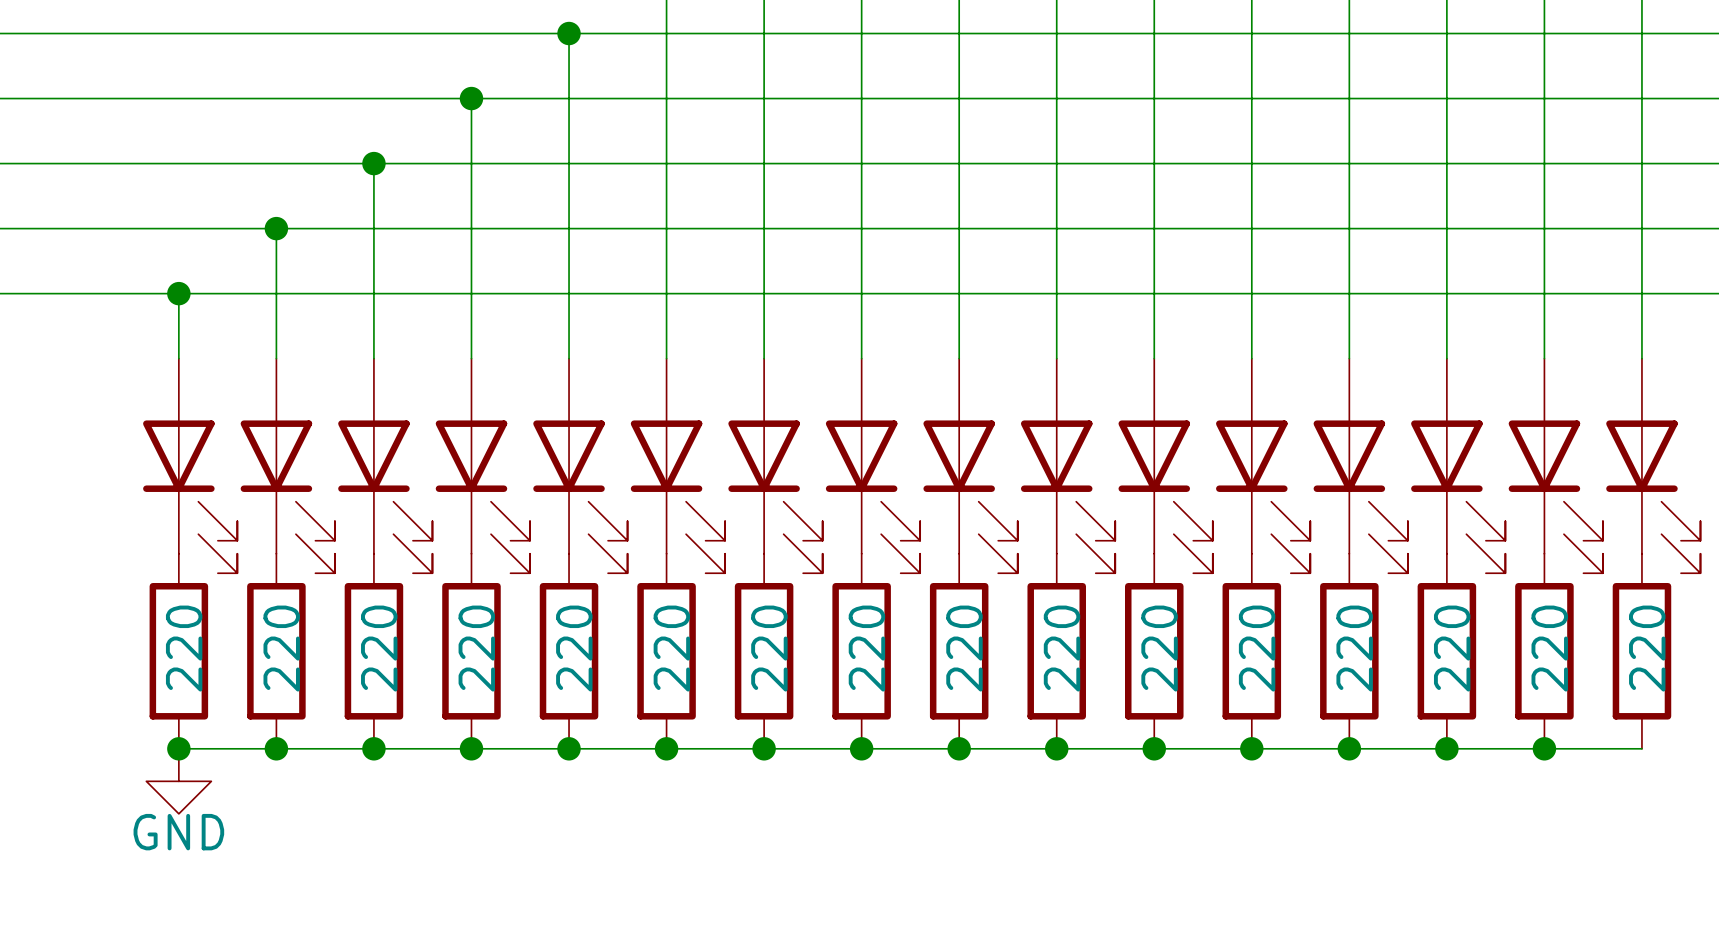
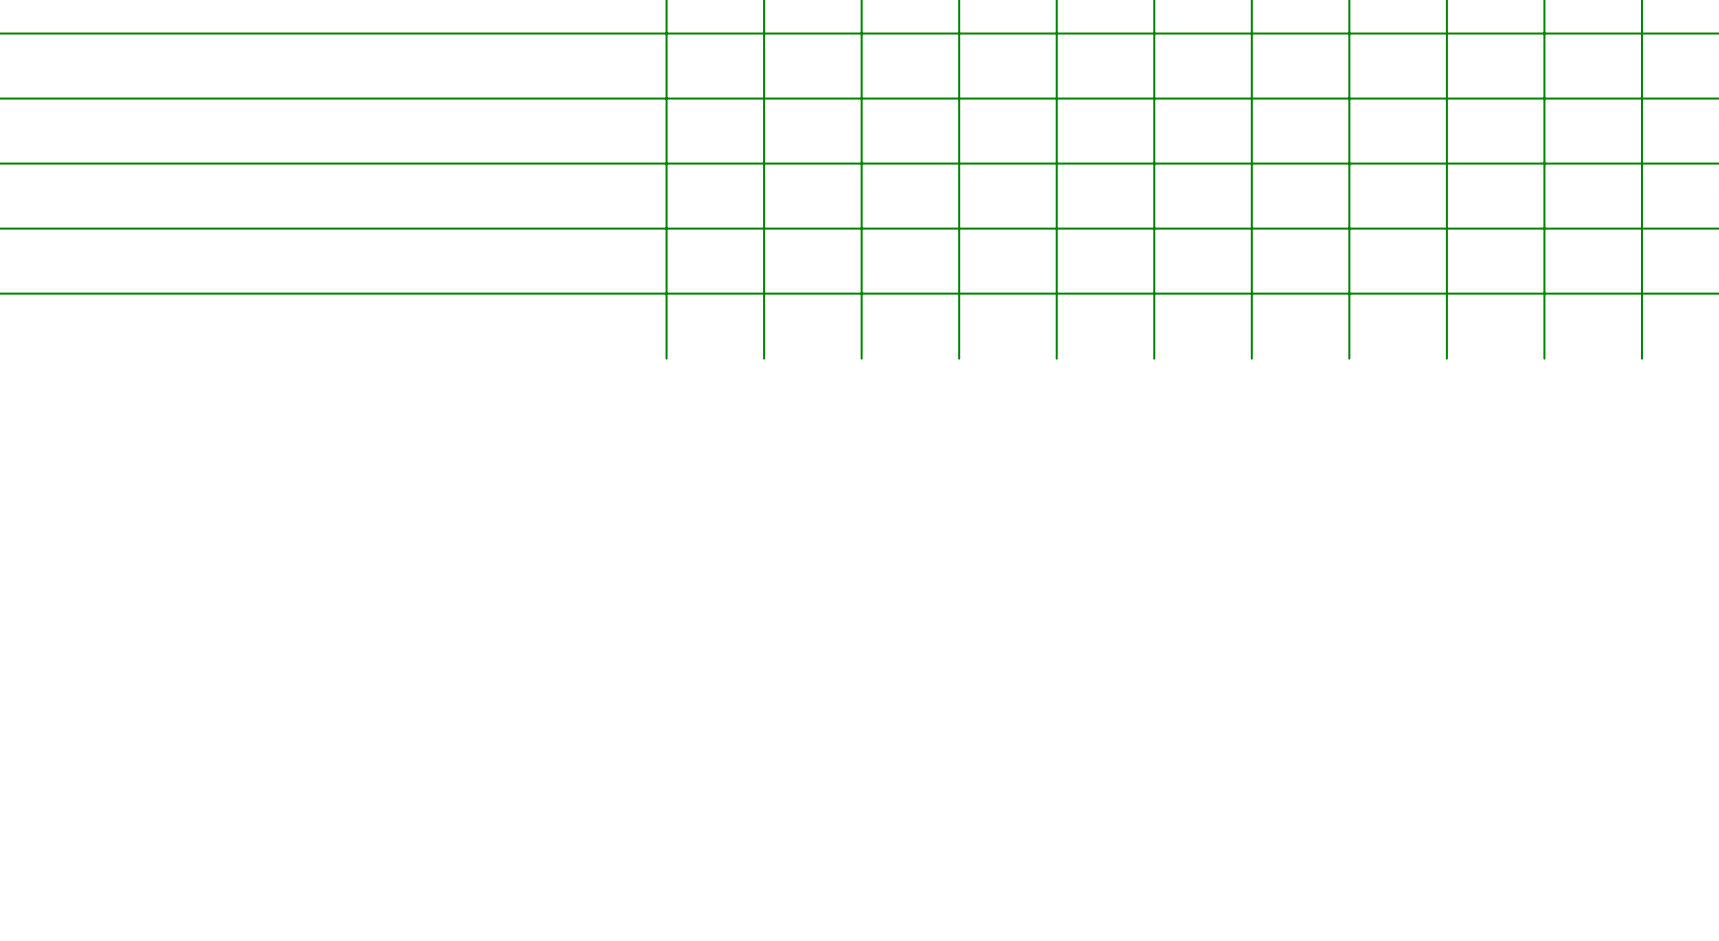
wire: (569, 33) (569, 358) -> none
junction: (569, 33) -> none
wire: (471, 98) (471, 358) -> none
junction: (471, 98) -> none
wire: (373, 163) (373, 358) -> none
junction: (373, 163) -> none
wire: (276, 228) (276, 358) -> none
junction: (276, 228) -> none
wire: (178, 293) (178, 358) -> none
junction: (178, 293) -> none
part: (190, 465) -> none
part: (287, 465) -> none
part: (385, 465) -> none
part: (482, 465) -> none
part: (580, 465) -> none
part: (677, 465) -> none
part: (775, 465) -> none
part: (873, 465) -> none
part: (970, 465) -> none
part: (1068, 465) -> none
part: (1165, 465) -> none
part: (1263, 465) -> none
part: (1360, 465) -> none
part: (1458, 465) -> none
part: (1555, 465) -> none
part: (1653, 465) -> none
part: 220 (178, 651) -> none
part: 220 (276, 651) -> none
part: 220 (373, 651) -> none
part: 220 (471, 651) -> none
part: 220 (569, 651) -> none
part: 220 (666, 651) -> none
part: 220 (764, 651) -> none
part: 220 (861, 651) -> none
part: 220 (959, 651) -> none
part: 220 (1056, 651) -> none
part: 220 (1154, 651) -> none
part: 220 (1251, 651) -> none
part: 220 (1349, 651) -> none
part: 220 (1446, 651) -> none
part: 220 (1544, 651) -> none
part: 220 (1641, 651) -> none
wire: (178, 748) (1641, 748) -> none
junction: (178, 748) -> none
junction: (276, 748) -> none
junction: (373, 748) -> none
junction: (471, 748) -> none
junction: (569, 748) -> none
junction: (666, 748) -> none
junction: (764, 748) -> none
junction: (861, 748) -> none
junction: (959, 748) -> none
junction: (1056, 748) -> none
junction: (1154, 748) -> none
junction: (1251, 748) -> none
junction: (1349, 748) -> none
junction: (1446, 748) -> none
junction: (1544, 748) -> none
power symbol: GND (178, 781) -> none

